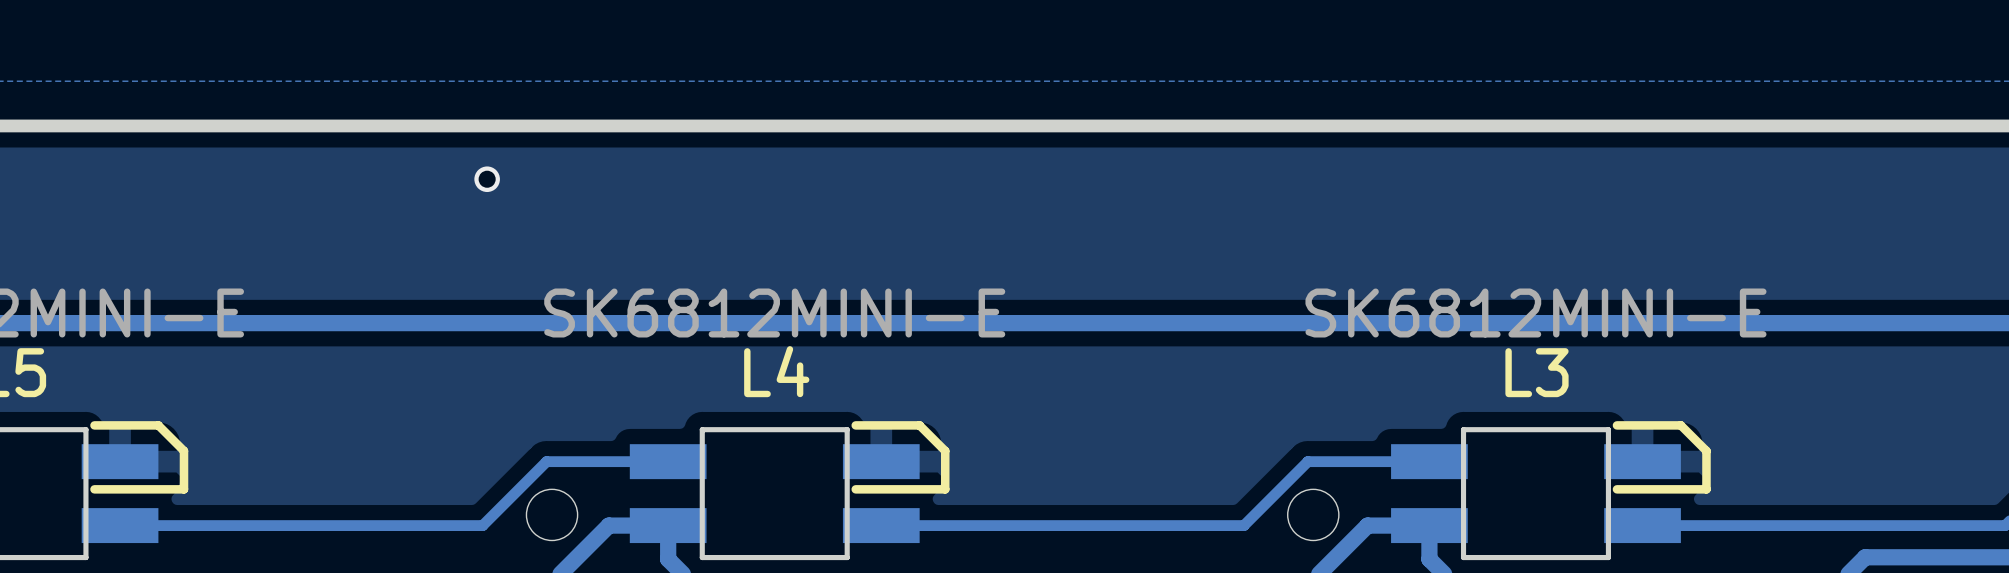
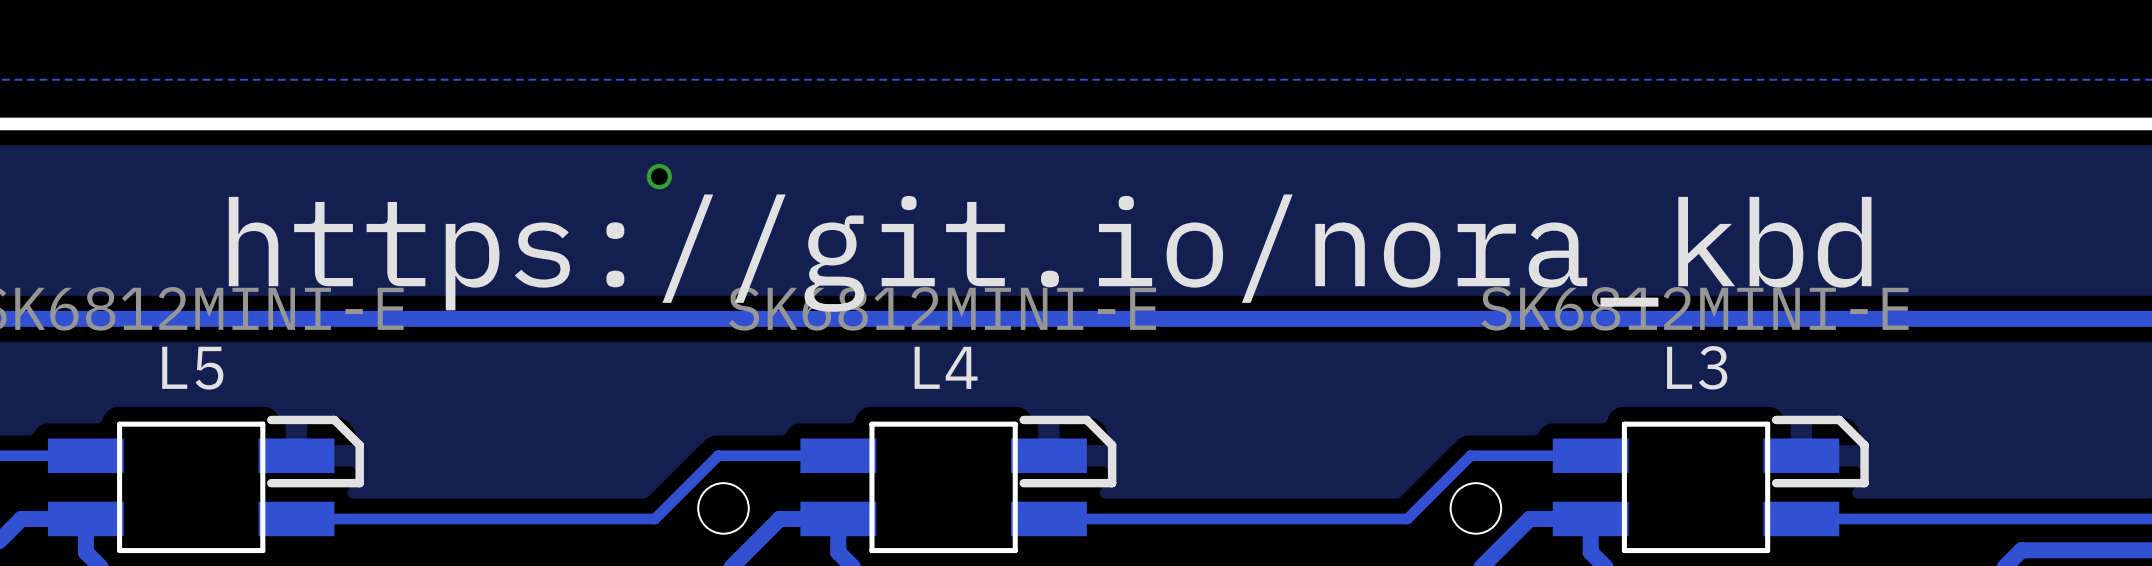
text: none -> https://git.io/nora_kbd (1050, 253)

